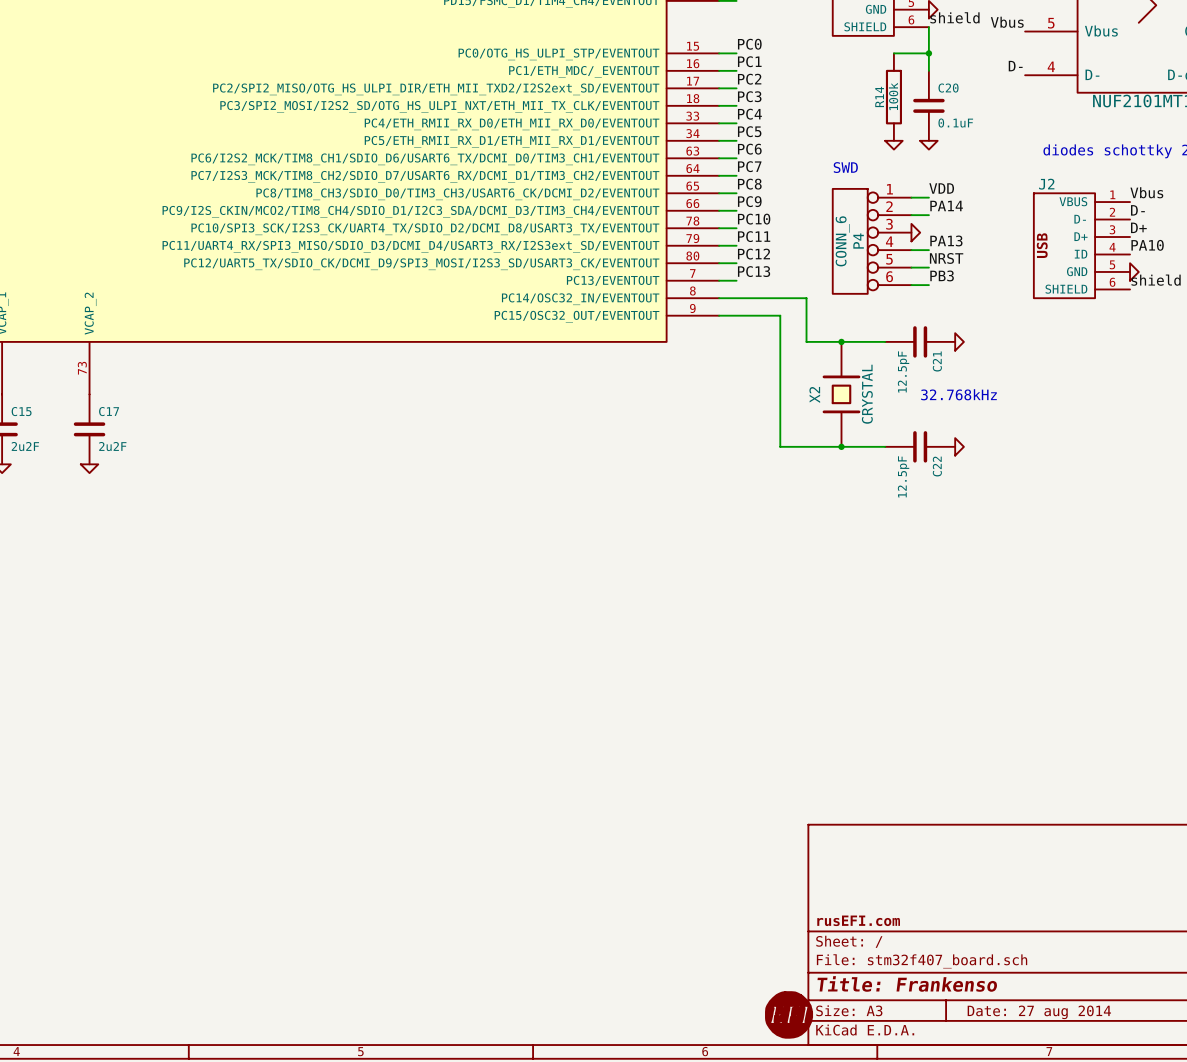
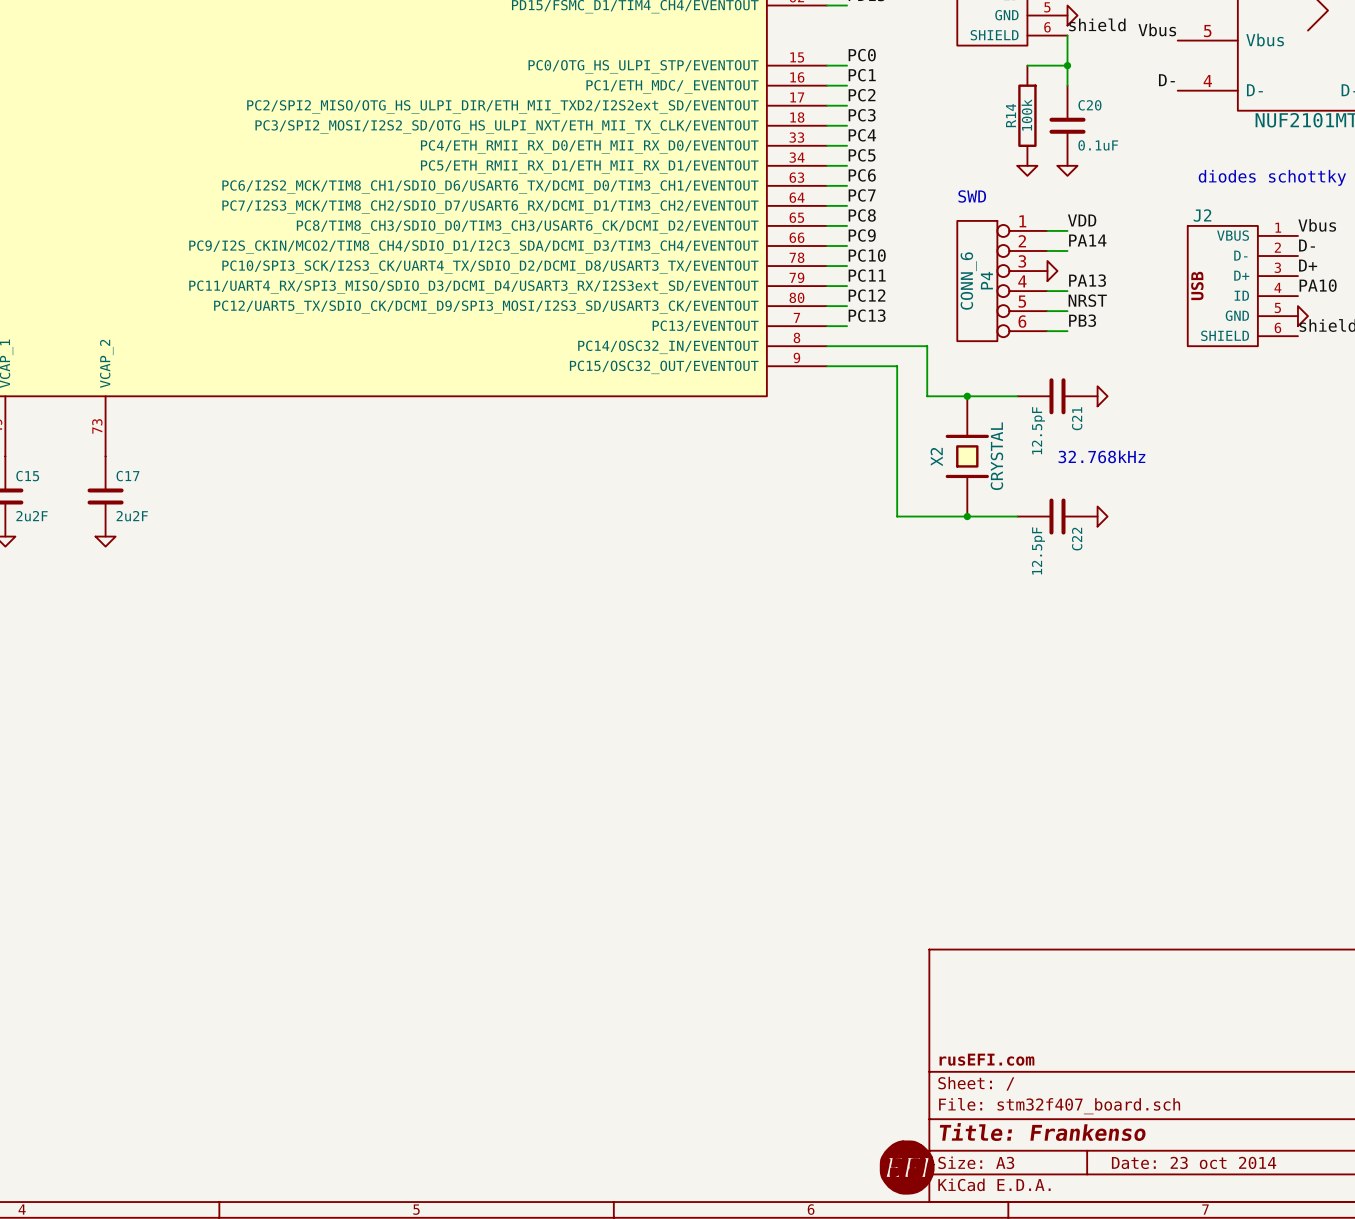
title block: Date: 27 aug 2014 (1039, 1012) -> Date: 23 oct 2014 (1194, 1162)

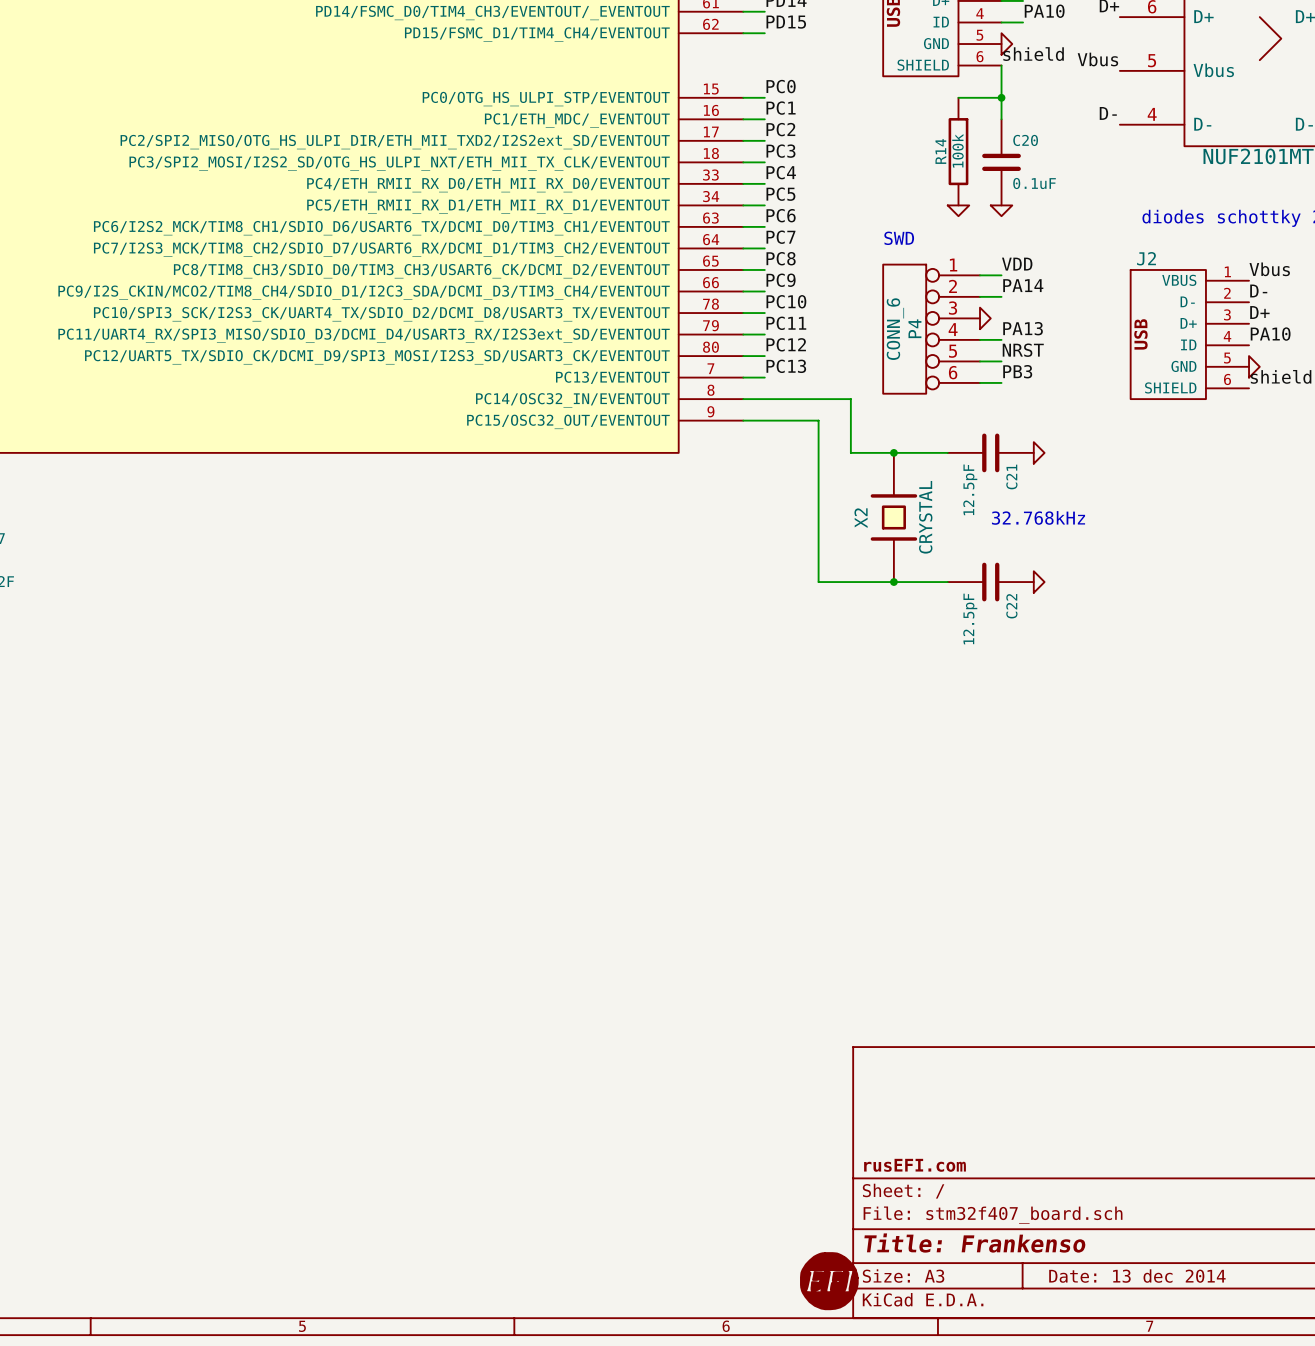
title block: Date: 23 oct 2014 (1194, 1162) -> Date: 13 dec 2014 (1137, 1276)

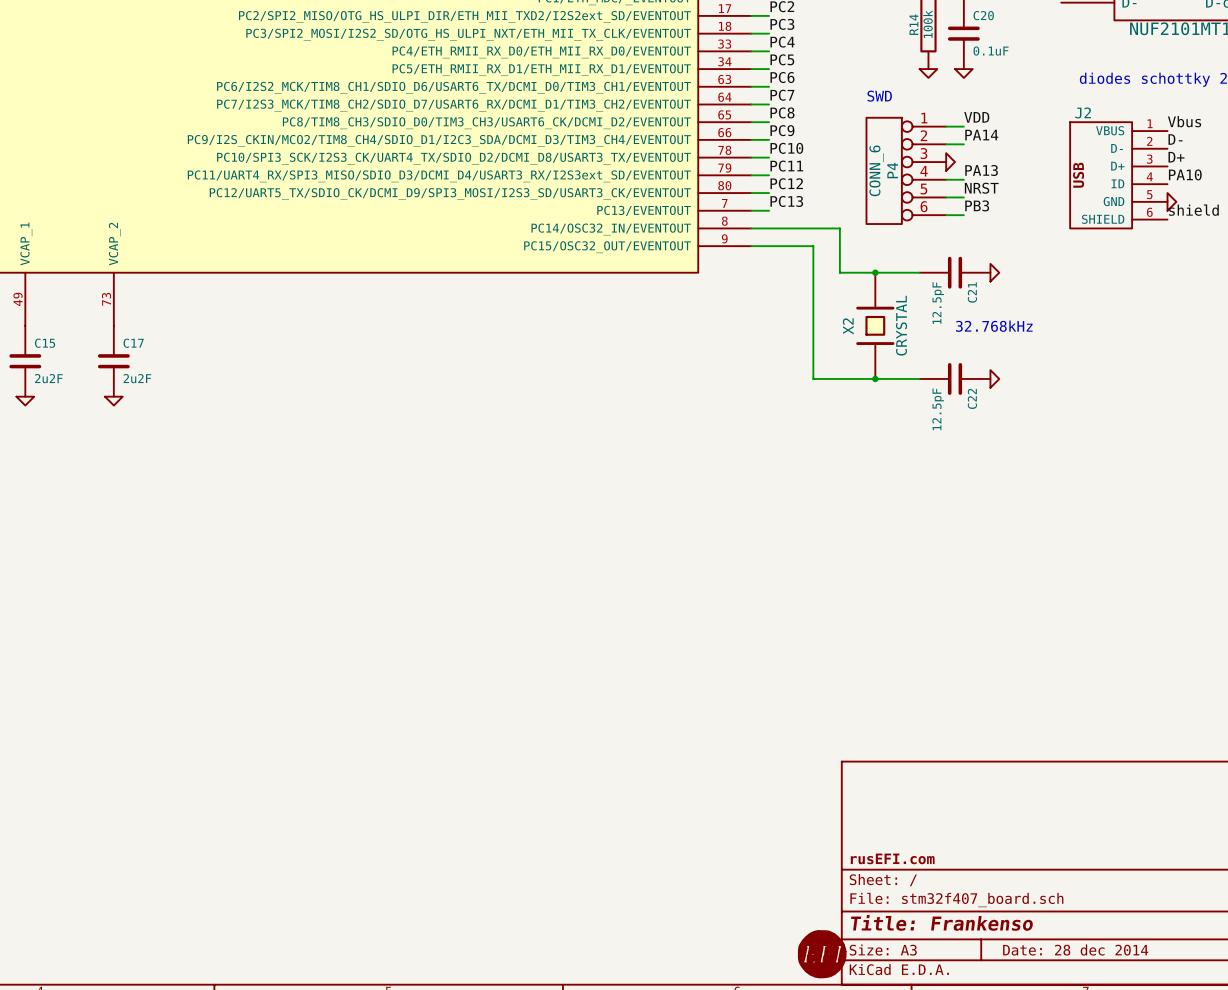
title block: Date: 13 dec 2014 (1137, 1276) -> Date: 28 dec 2014 (1075, 950)

